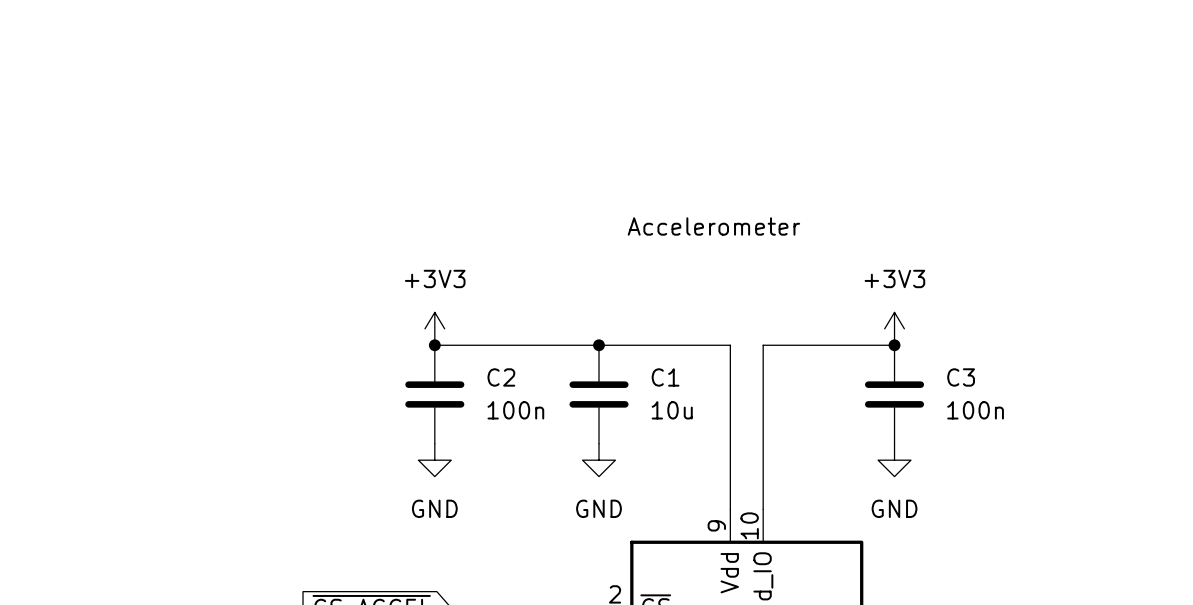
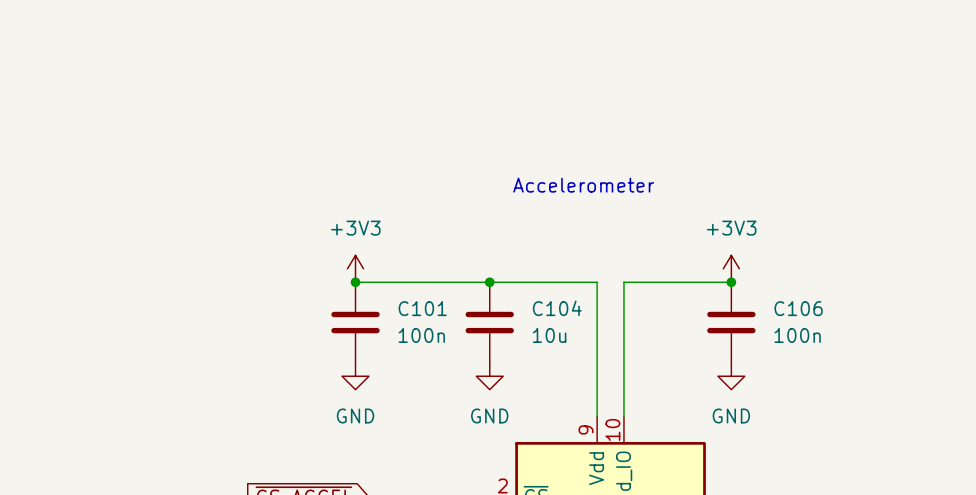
C2 name: C2 (501, 377) -> C101 (422, 308)
C1 name: C1 (665, 377) -> C104 (557, 308)
C3 name: C3 (961, 377) -> C106 (798, 308)

